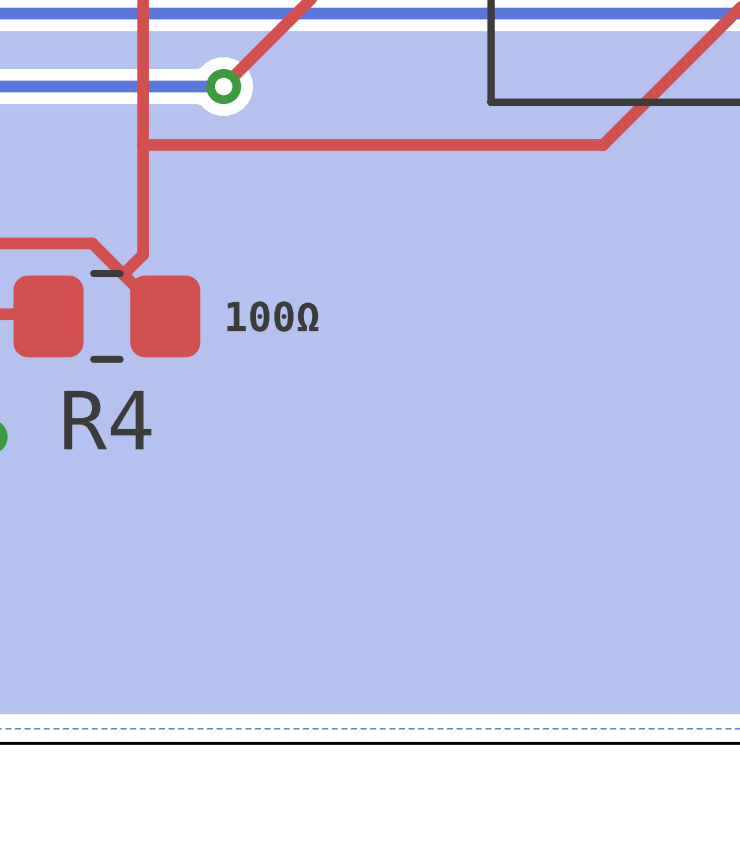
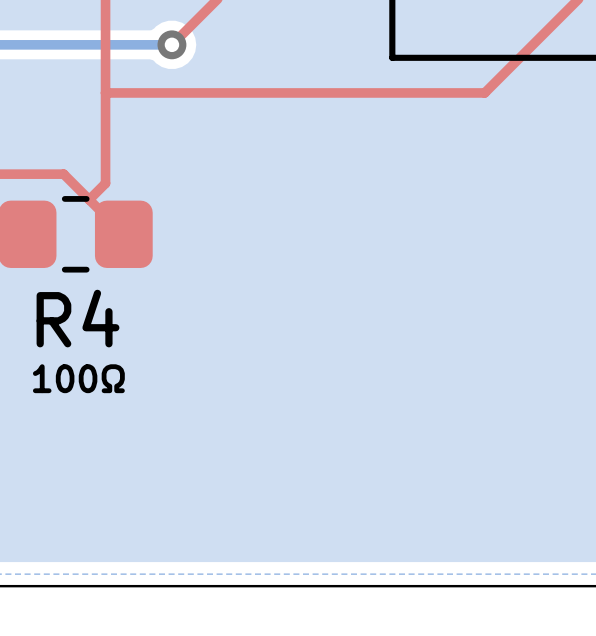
text position: 100Ω (272, 316) -> 100Ω (78, 378)

